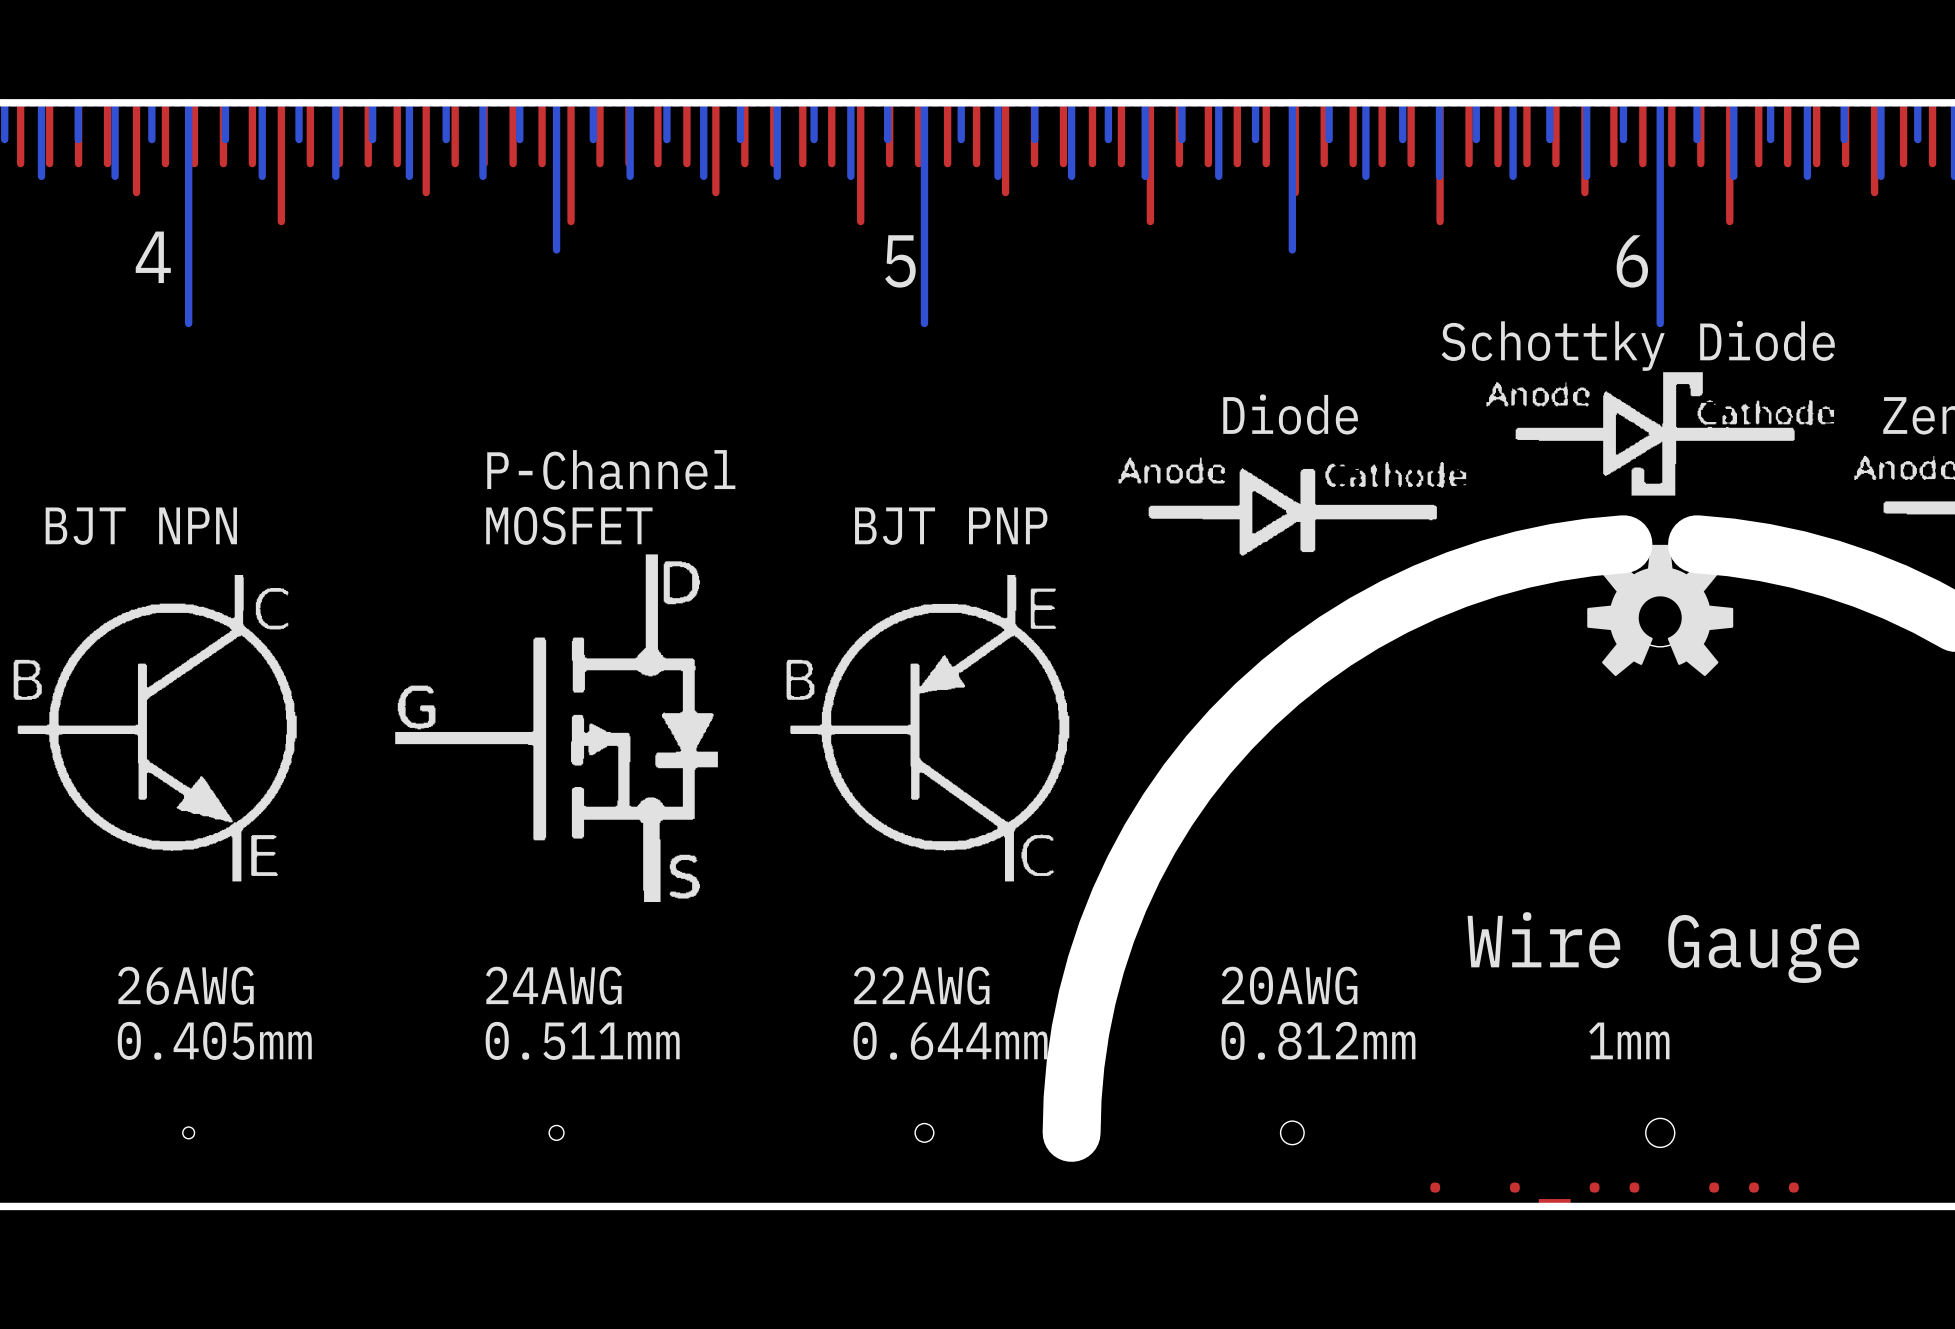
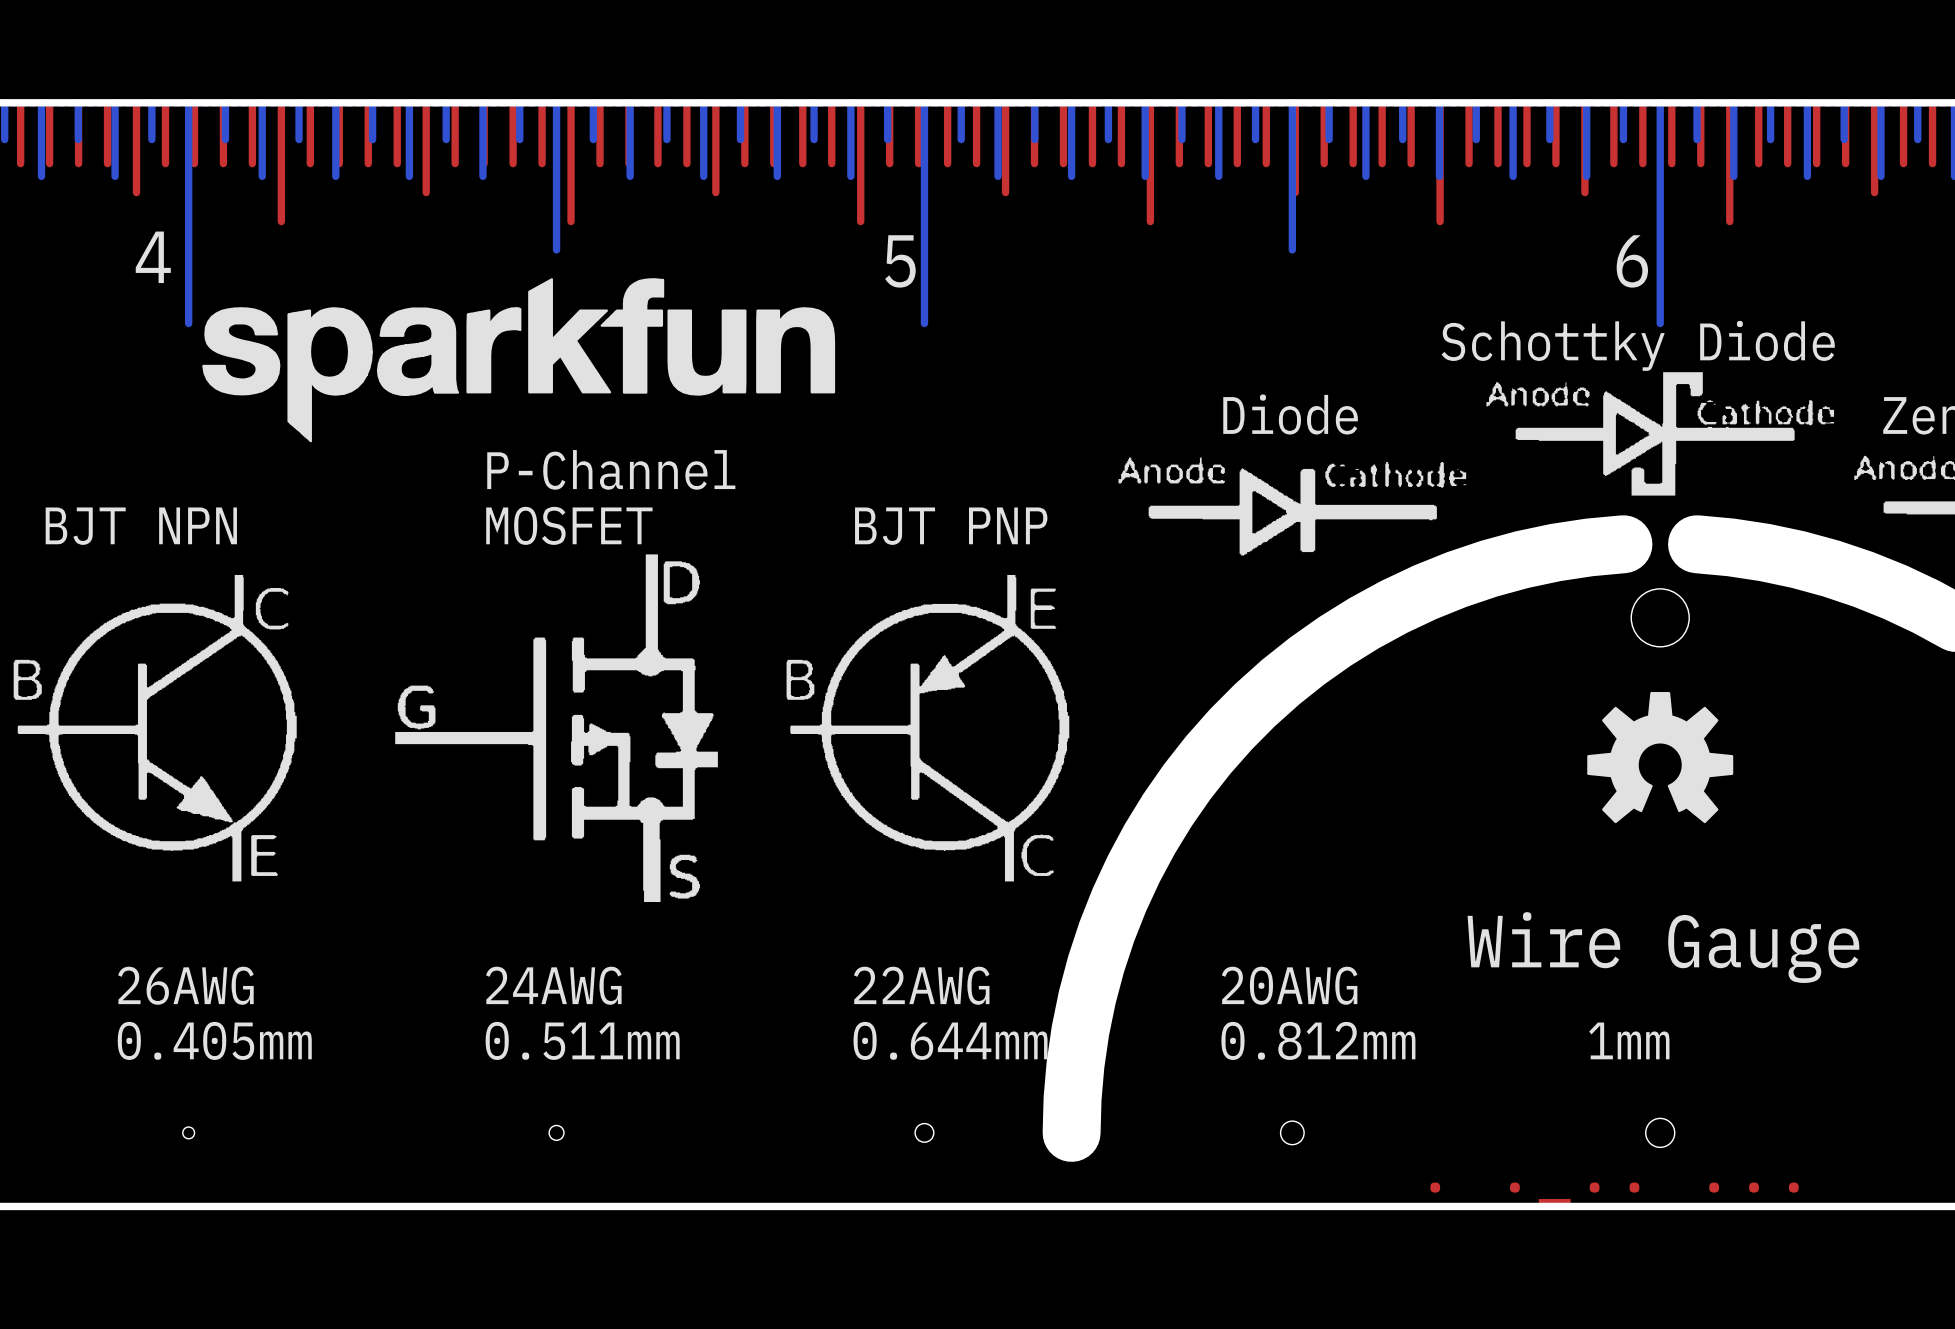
drawing: none -> [202, 278, 836, 443]
drawing position: (1660, 610) -> (1660, 757)

